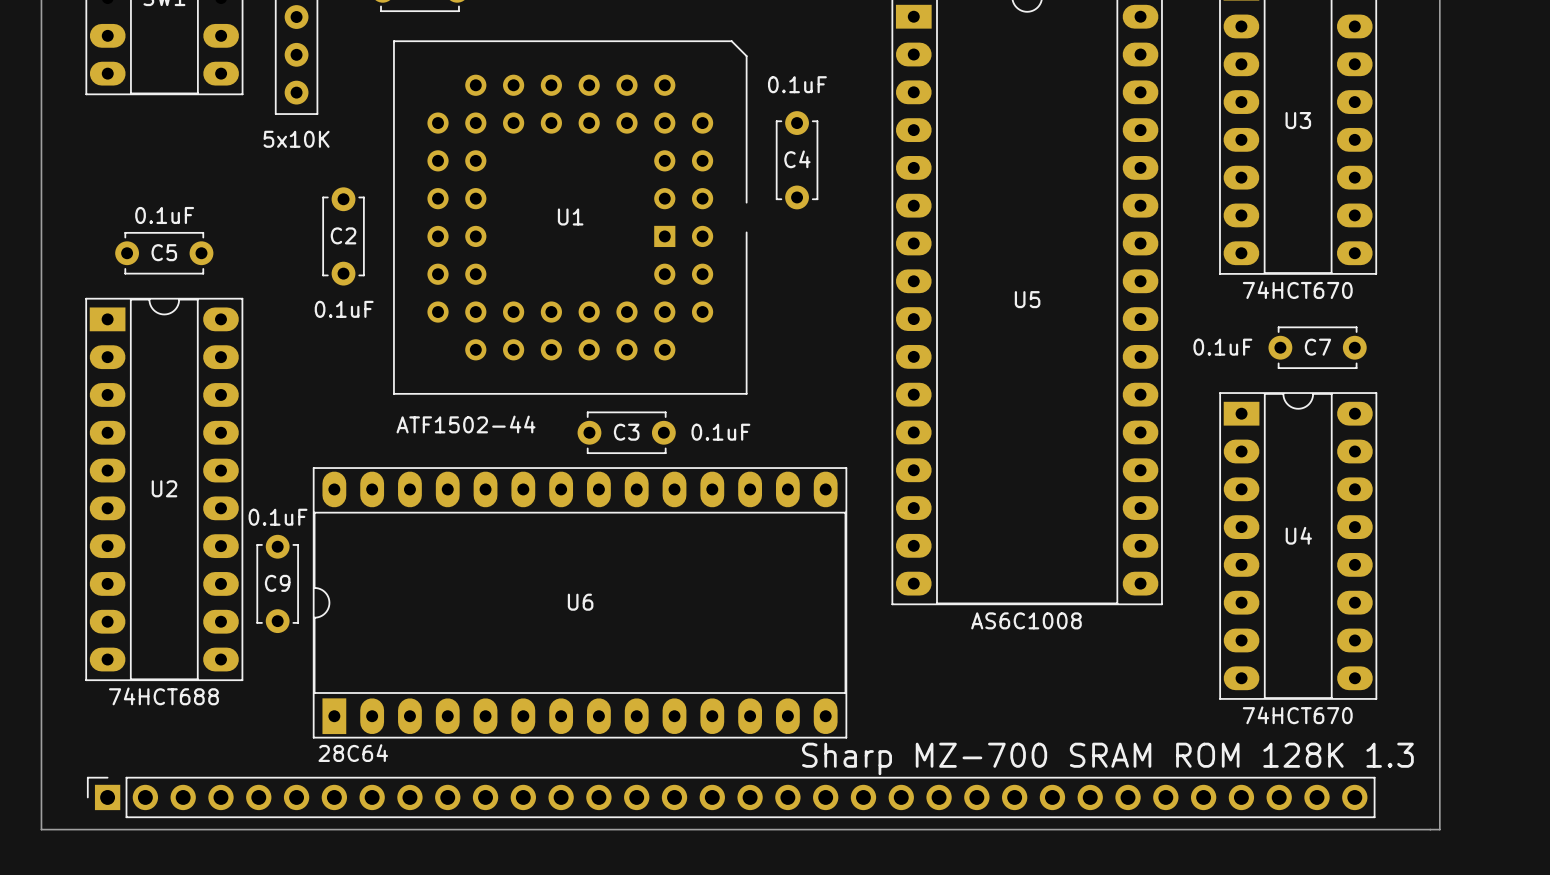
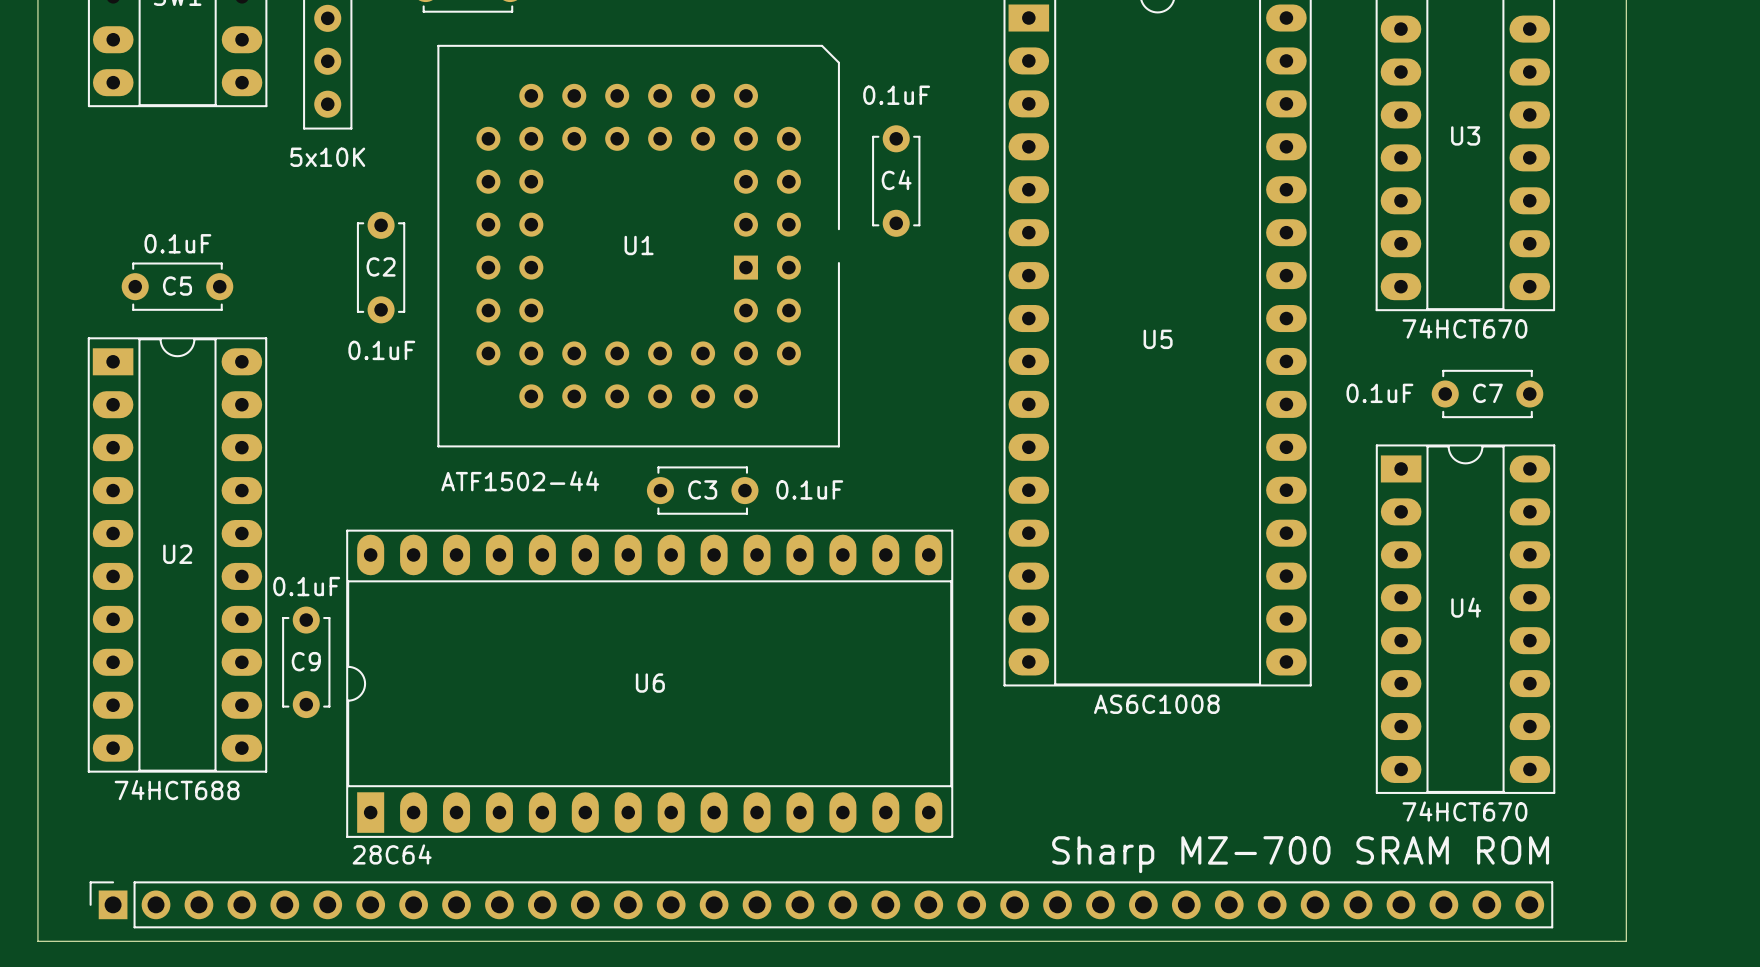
text: Sharp MZ-700 SRAM ROM 128K 1.3 (1107, 758) -> Sharp MZ-700 SRAM ROM (1300, 854)

